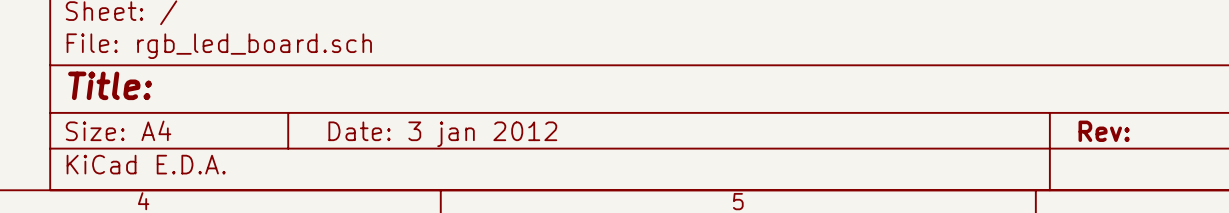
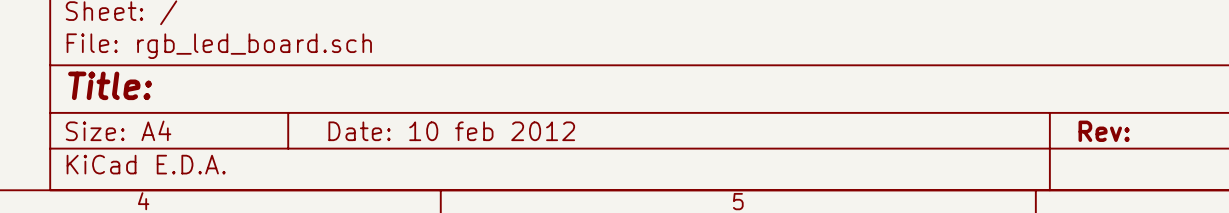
title block: Date: 3 jan 2012 (442, 134) -> Date: 10 feb 2012 (451, 131)

